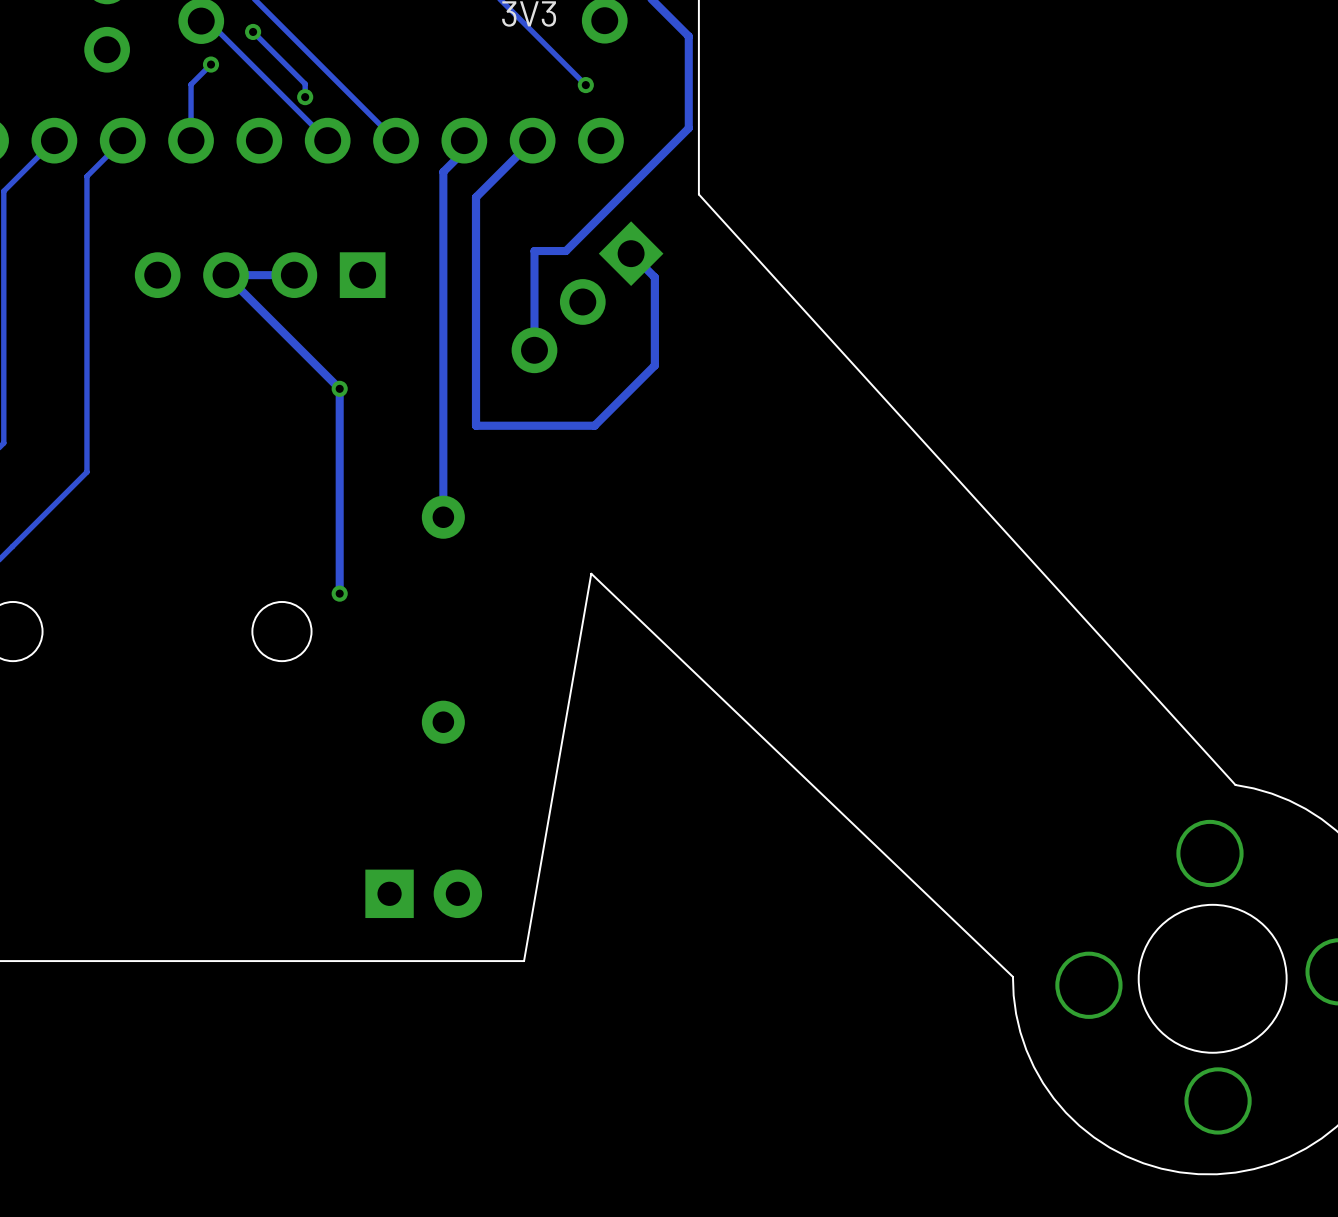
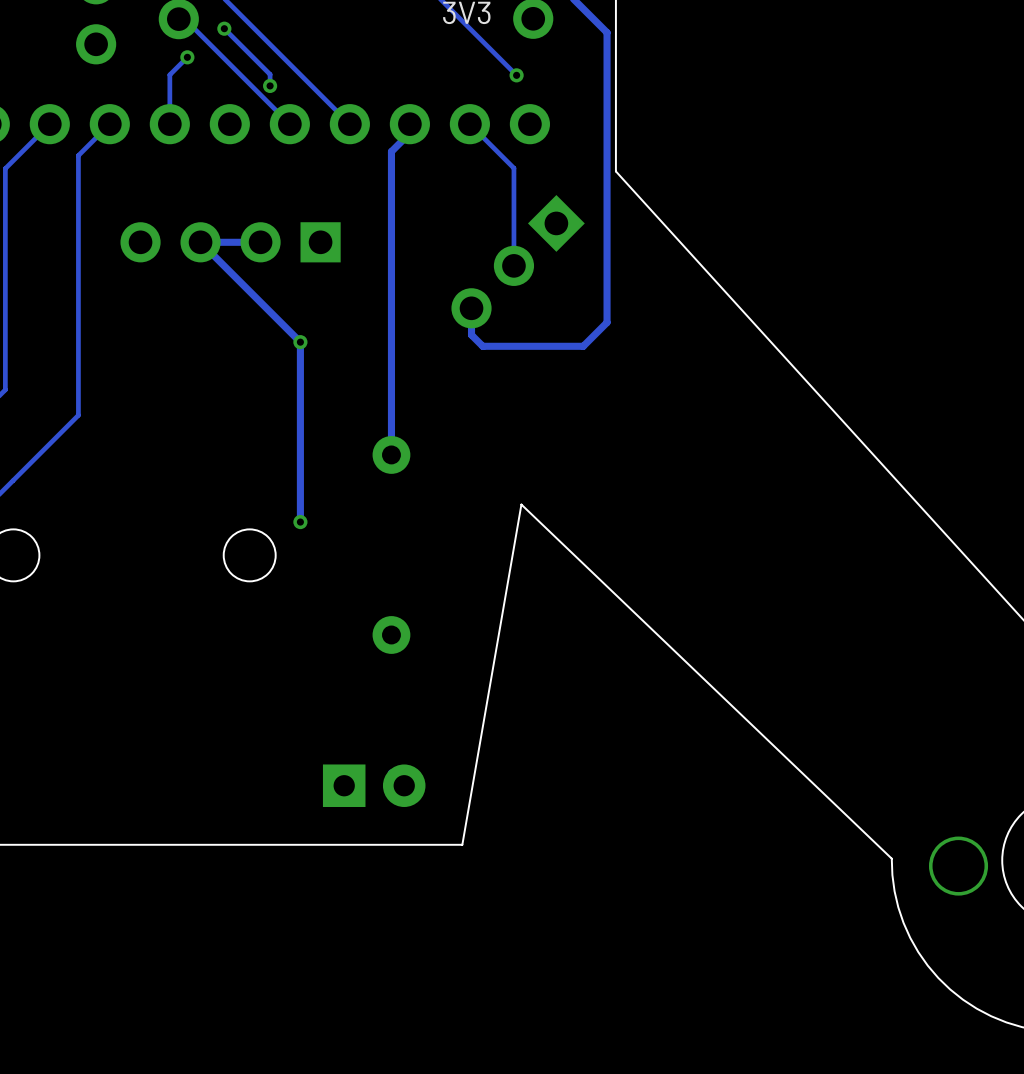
track: (688, 128) (565, 251) (534, 251) (534, 350) -> (607, 113) (607, 322) (583, 346)
track: (532, 140) (476, 197) (476, 425) (594, 425) (654, 365) (654, 277) (631, 253) -> (469, 124) (513, 168) (513, 265)
track: none -> (471, 308) (471, 335) (482, 346)
track: none -> (583, 346) (483, 346)

